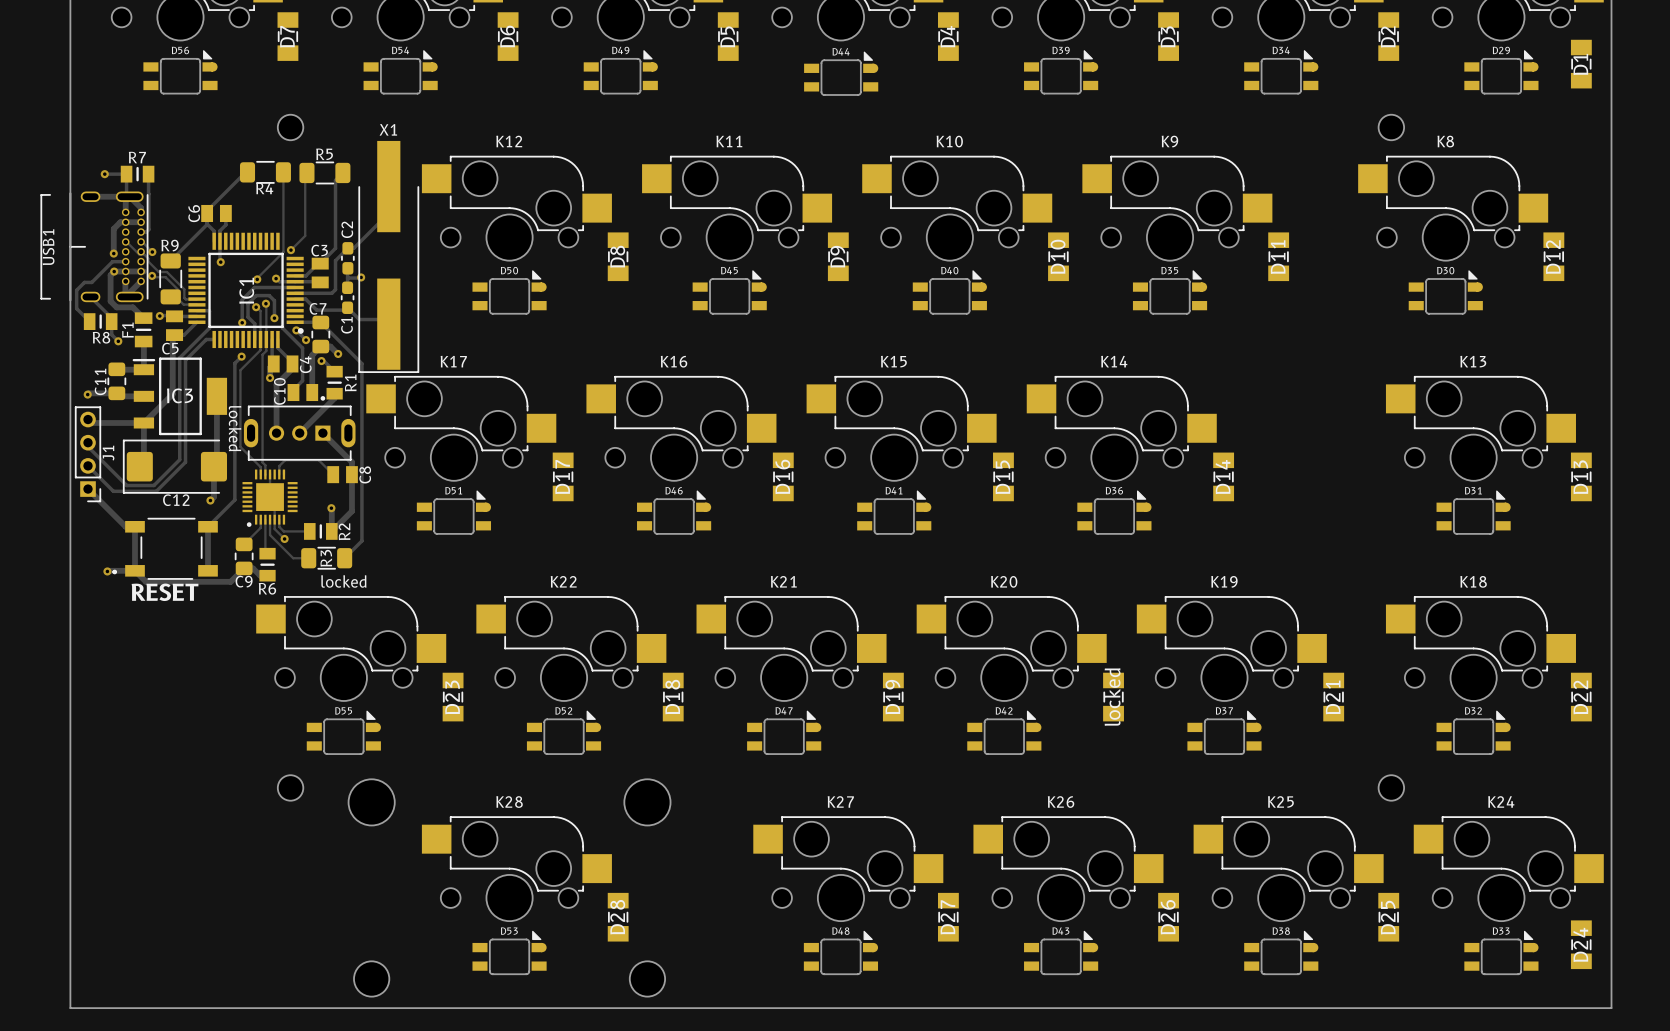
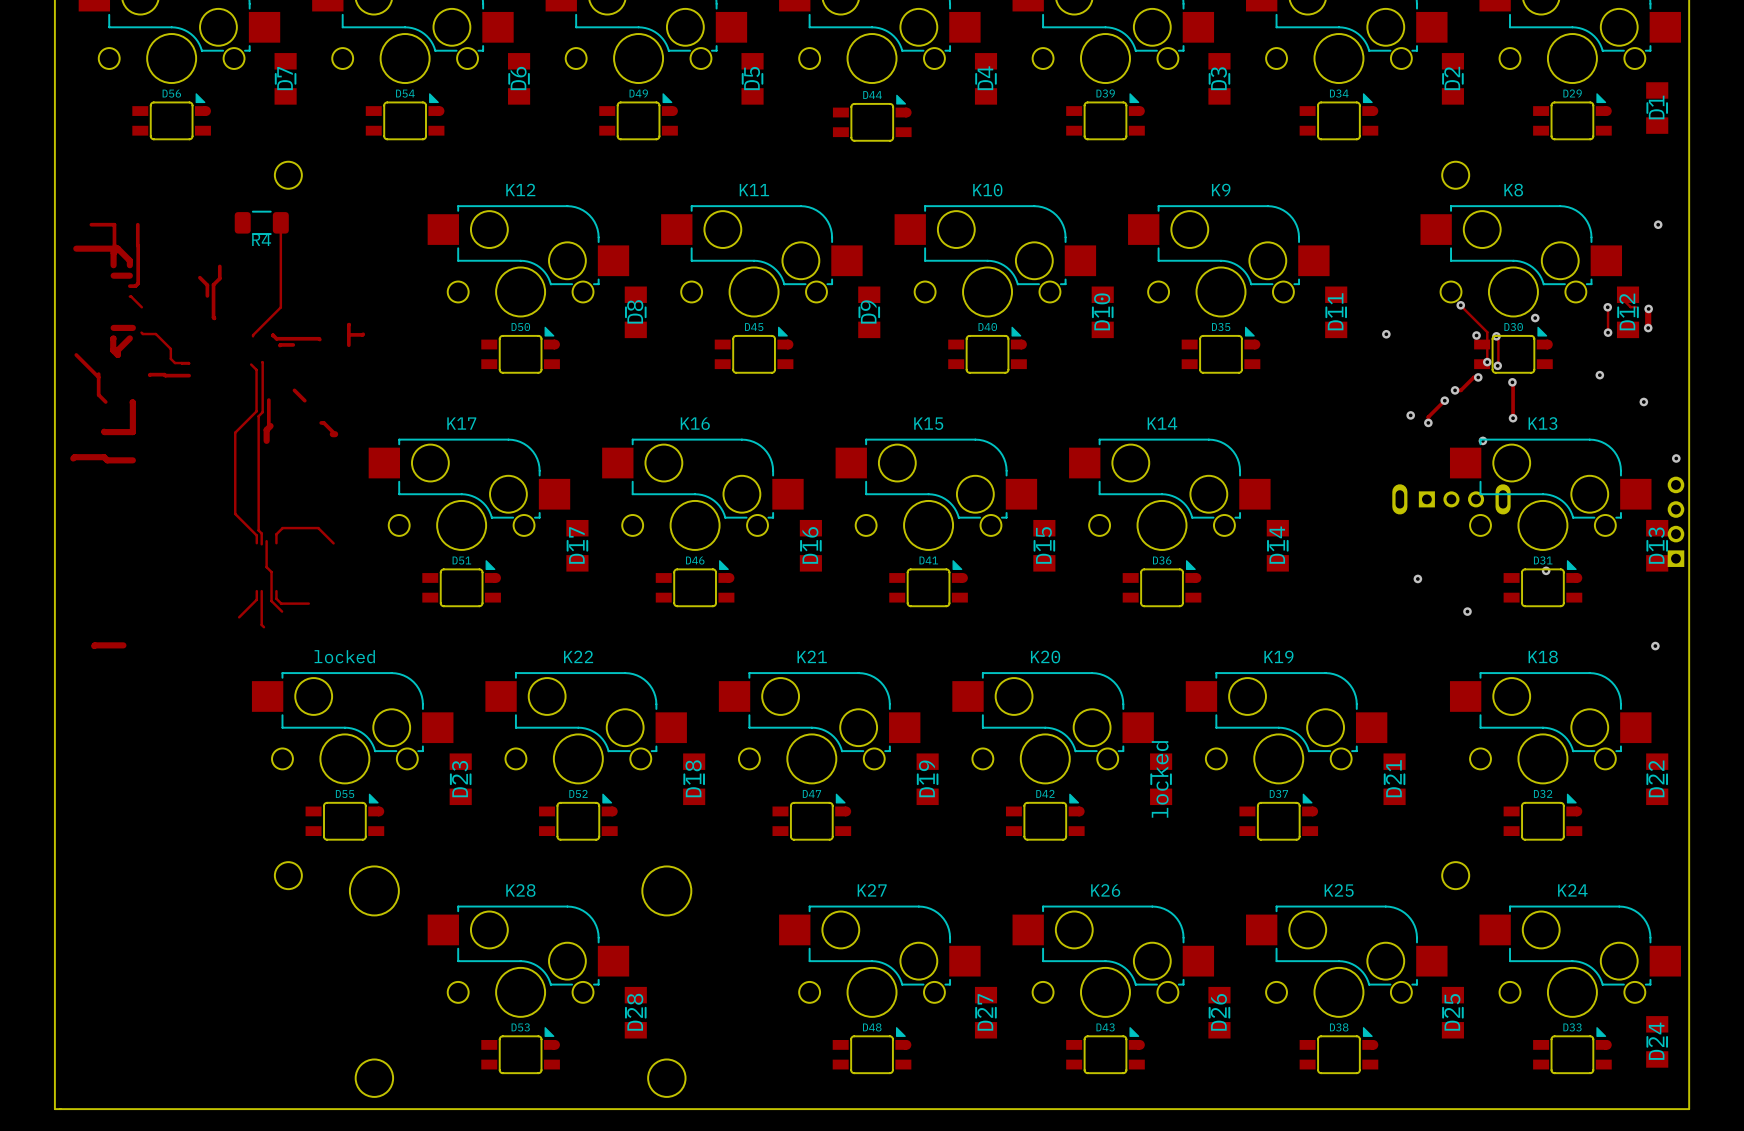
track: (247, 172) (207, 210) (207, 224) (170, 260) (169, 259) -> none
track: (306, 172) (305, 174) (305, 235) (290, 250) -> none
R5: (324, 172) -> none
track: (342, 172) (335, 180) (335, 248) (305, 275) (295, 275) -> none
via: (104, 174) -> none
R7: (137, 174) -> none
via: none -> (1658, 224)
track: (388, 186) (388, 213) (353, 248) (347, 248) (335, 260) (335, 289) (331, 293) (295, 293) -> none
C6: (216, 213) -> none
track: (125, 222) (120, 222) (113, 228) (113, 253) -> none
track: (125, 241) (139, 254) (144, 254) (158, 272) (166, 272) (184, 289) (185, 299) (196, 299) (196, 299) (190, 299) (189, 299) -> none
track: none -> (1619, 296) (1630, 307) (1635, 307)
USB1: (94, 246) -> none
via: (290, 250) -> none
track: none -> (1460, 305) (1487, 332) (1487, 362)
via: none -> (1460, 305)
via: (152, 252) -> none
track: none -> (1607, 307) (1608, 332)
via: none -> (1607, 307)
via: (113, 253) -> none
track: none -> (1648, 308) (1648, 328)
via: none -> (1648, 308)
X1: (388, 256) -> none
C2: (347, 258) -> none
track: (125, 261) (112, 261) (91, 282) (84, 282) (76, 290) (76, 308) (89, 321) -> none
via: (220, 262) -> none
via: none -> (1535, 318)
via: (114, 271) -> none
track: (125, 271) (114, 271) (110, 275) (110, 301) (116, 307) (132, 307) (143, 318) -> none
via: none -> (1648, 328)
C3: (320, 273) -> none
via: (152, 275) -> none
via: none -> (1608, 332)
via: (361, 277) -> none
via: none -> (1386, 334)
R9: (170, 278) -> none
via: (276, 278) -> none
via: none -> (1476, 335)
via: (257, 279) -> none
track: none -> (1496, 336) (1498, 338) (1498, 364)
via: none -> (1496, 336)
IC1: (246, 290) -> none
C1: (347, 297) -> none
track: (295, 299) (305, 299) (316, 310) (345, 310) (347, 307) (359, 319) (384, 319) (388, 324) -> none
via: (265, 303) -> none
via: none -> (1487, 362)
via: (256, 307) -> none
via: none -> (1497, 365)
track: (196, 310) (209, 311) (209, 328) (179, 357) (179, 459) (153, 485) (126, 485) (88, 446) (88, 442) -> none
via: (159, 316) -> none
via: none -> (1599, 375)
track: (274, 318) (274, 300) (269, 295) (256, 295) (248, 303) (248, 317) (254, 323) (254, 339) -> none
via: (274, 318) -> none
track: none -> (1478, 377) (1473, 377) (1460, 390) (1455, 390)
via: none -> (1478, 377)
R8: (100, 321) -> none
track: (196, 322) (184, 335) (172, 336) (172, 394) (143, 423) -> none
track: (242, 322) (242, 299) (254, 287) (282, 287) (282, 328) (302, 348) (302, 380) (293, 389) (293, 392) -> none
via: (242, 322) -> none
track: (295, 322) (320, 322) (361, 363) (361, 540) (344, 558) -> none
track: none -> (1512, 382) (1513, 418)
via: none -> (1512, 382)
C5: (174, 325) -> none
F1: (143, 329) -> none
via: (296, 330) -> none
via: none -> (1455, 390)
C7: (320, 334) -> none
track: (214, 339) (206, 339) (185, 360) (185, 462) (156, 491) (113, 491) (88, 465) -> none
track: (277, 339) (277, 347) (292, 362) (292, 368) (276, 384) (276, 433) -> none
via: (306, 340) -> none
track: none -> (1444, 400) (1428, 417) (1428, 422)
via: none -> (1444, 400)
via: (118, 341) -> none
via: none -> (1643, 401)
track: (337, 353) (330, 346) (320, 346) (312, 355) (312, 392) -> none
via: (338, 353) -> none
via: none -> (1410, 415)
track: (241, 356) (234, 363) (234, 499) (208, 526) (208, 570) -> none
via: (241, 356) -> none
via: none -> (1513, 418)
via: (321, 361) -> none
via: none -> (1428, 422)
C4: (283, 363) -> none
via: (270, 377) -> none
via: none -> (1482, 440)
C11: (116, 381) -> none
R1: (334, 382) -> none
C10: (302, 392) -> none
track: (334, 393) (334, 398) (299, 433) -> none
via: (87, 394) -> none
via: none -> (1676, 458)
IC3: (179, 396) -> none
track: (216, 396) (216, 463) (213, 466) (213, 497) (210, 500) -> none
track: (88, 419) (91, 423) (143, 423) -> none
track: (143, 423) (143, 462) (139, 466) -> none
text: locked (235, 428) -> none
part: (299, 428) -> none
track: (322, 433) (351, 462) (351, 511) (331, 531) (331, 508) -> none
part: none -> (1451, 499)
J1: (88, 454) -> none
part: none -> (1675, 521)
C12: (175, 466) -> none
C8: (342, 474) -> none
track: (88, 489) (125, 526) (135, 526) (135, 570) (146, 581) (230, 581) (244, 568) (253, 568) (260, 575) (267, 575) -> none
part: (270, 498) -> none
via: (210, 500) -> none
via: none -> (1546, 570)
via: (331, 508) -> none
via: none -> (1417, 578)
track: (270, 519) (270, 535) (293, 558) (308, 558) -> none
R2: (320, 531) -> none
via: (284, 538) -> none
via: none -> (1467, 611)
part: (165, 548) -> none
C9: (244, 556) -> none
R3: (326, 558) -> none
R6: (267, 564) -> none
via: (107, 571) -> none
via: none -> (1655, 646)
text: RESET (165, 592) -> none

